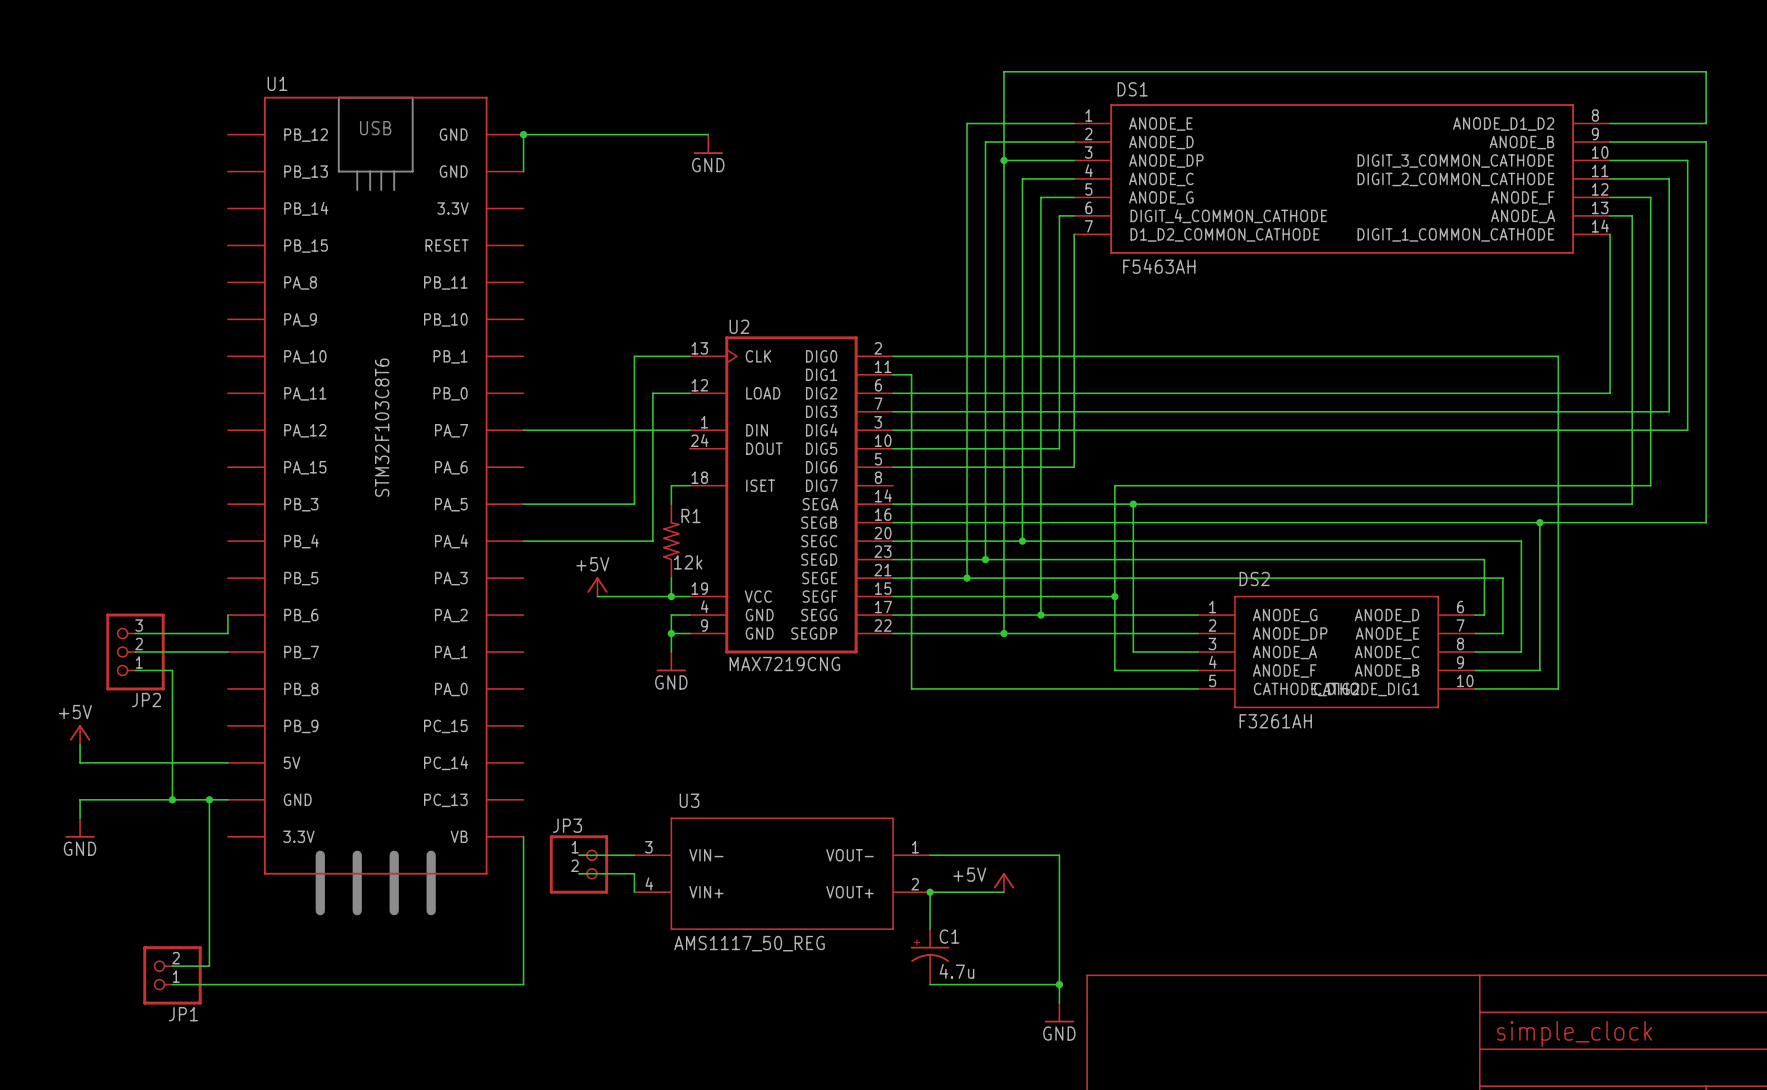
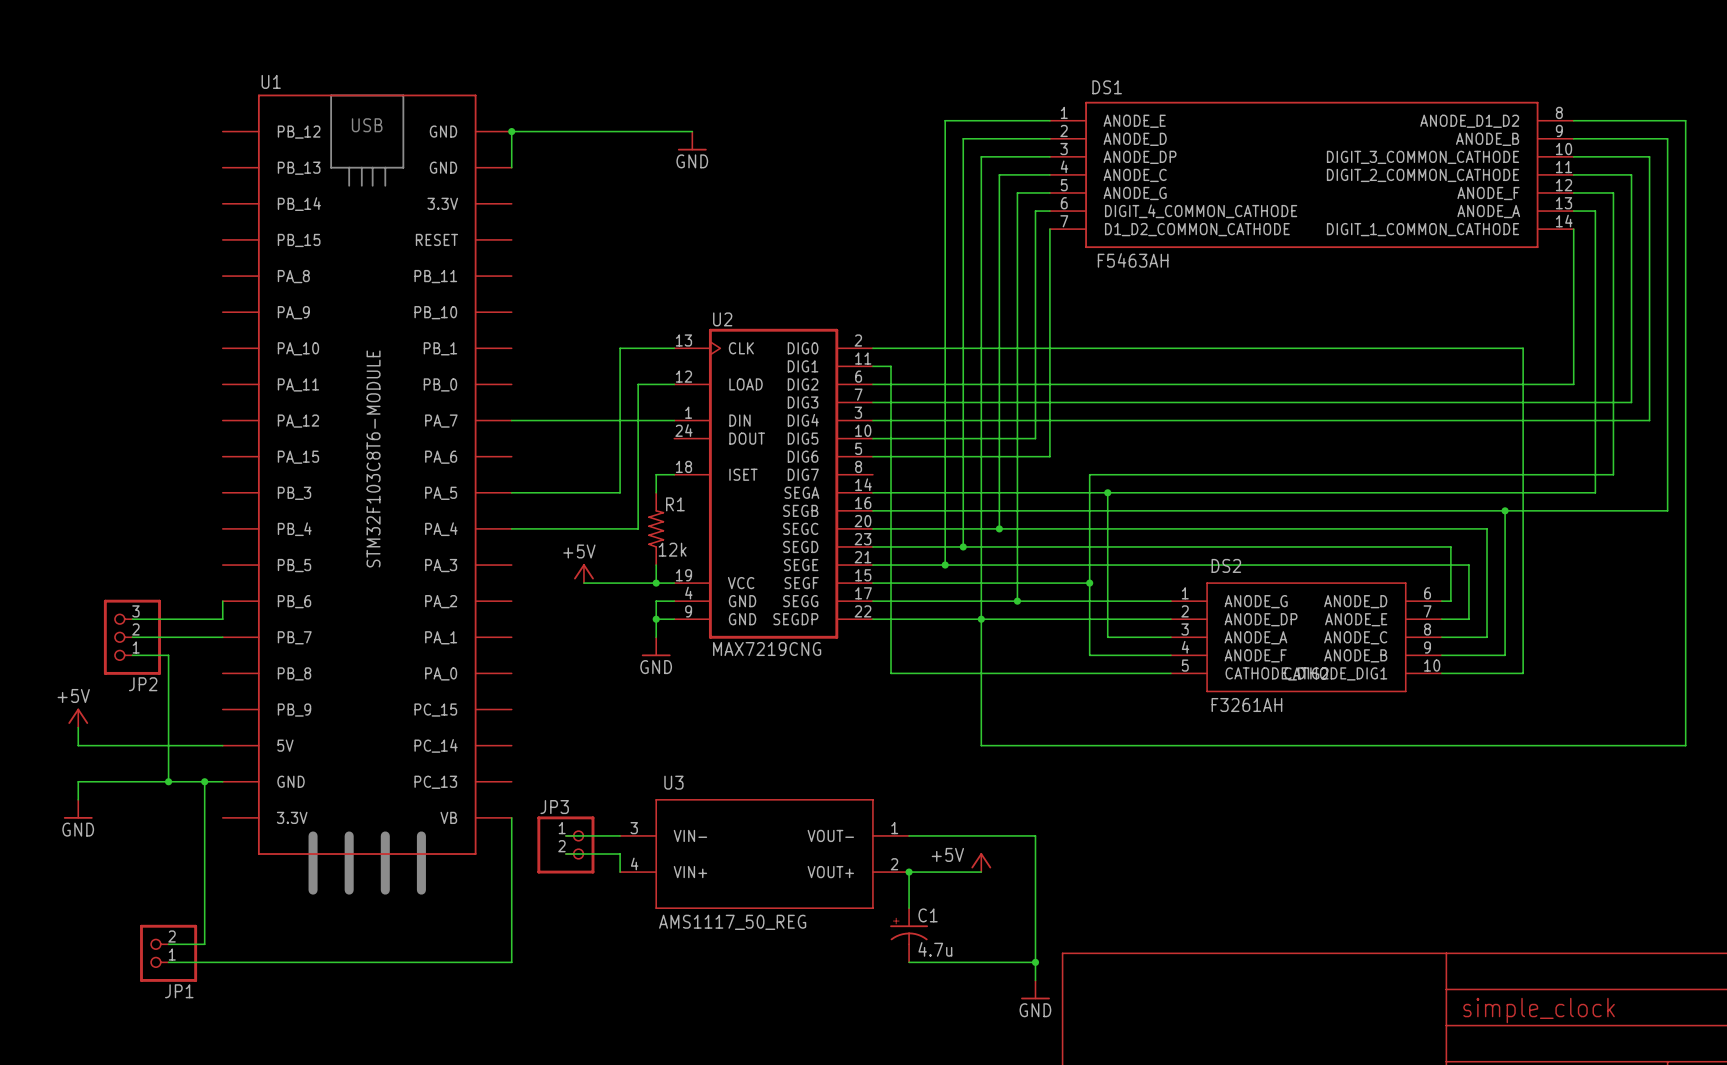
wire: (1706, 123) (1706, 71) (1003, 71) (1003, 160) -> (1667, 120) (1685, 120) (1685, 745) (981, 745) (981, 619)
junction: (1003, 160) -> none
U1 value: STM32F103C8T6 (382, 427) -> STM32F103C8T6-MODULE (373, 458)

